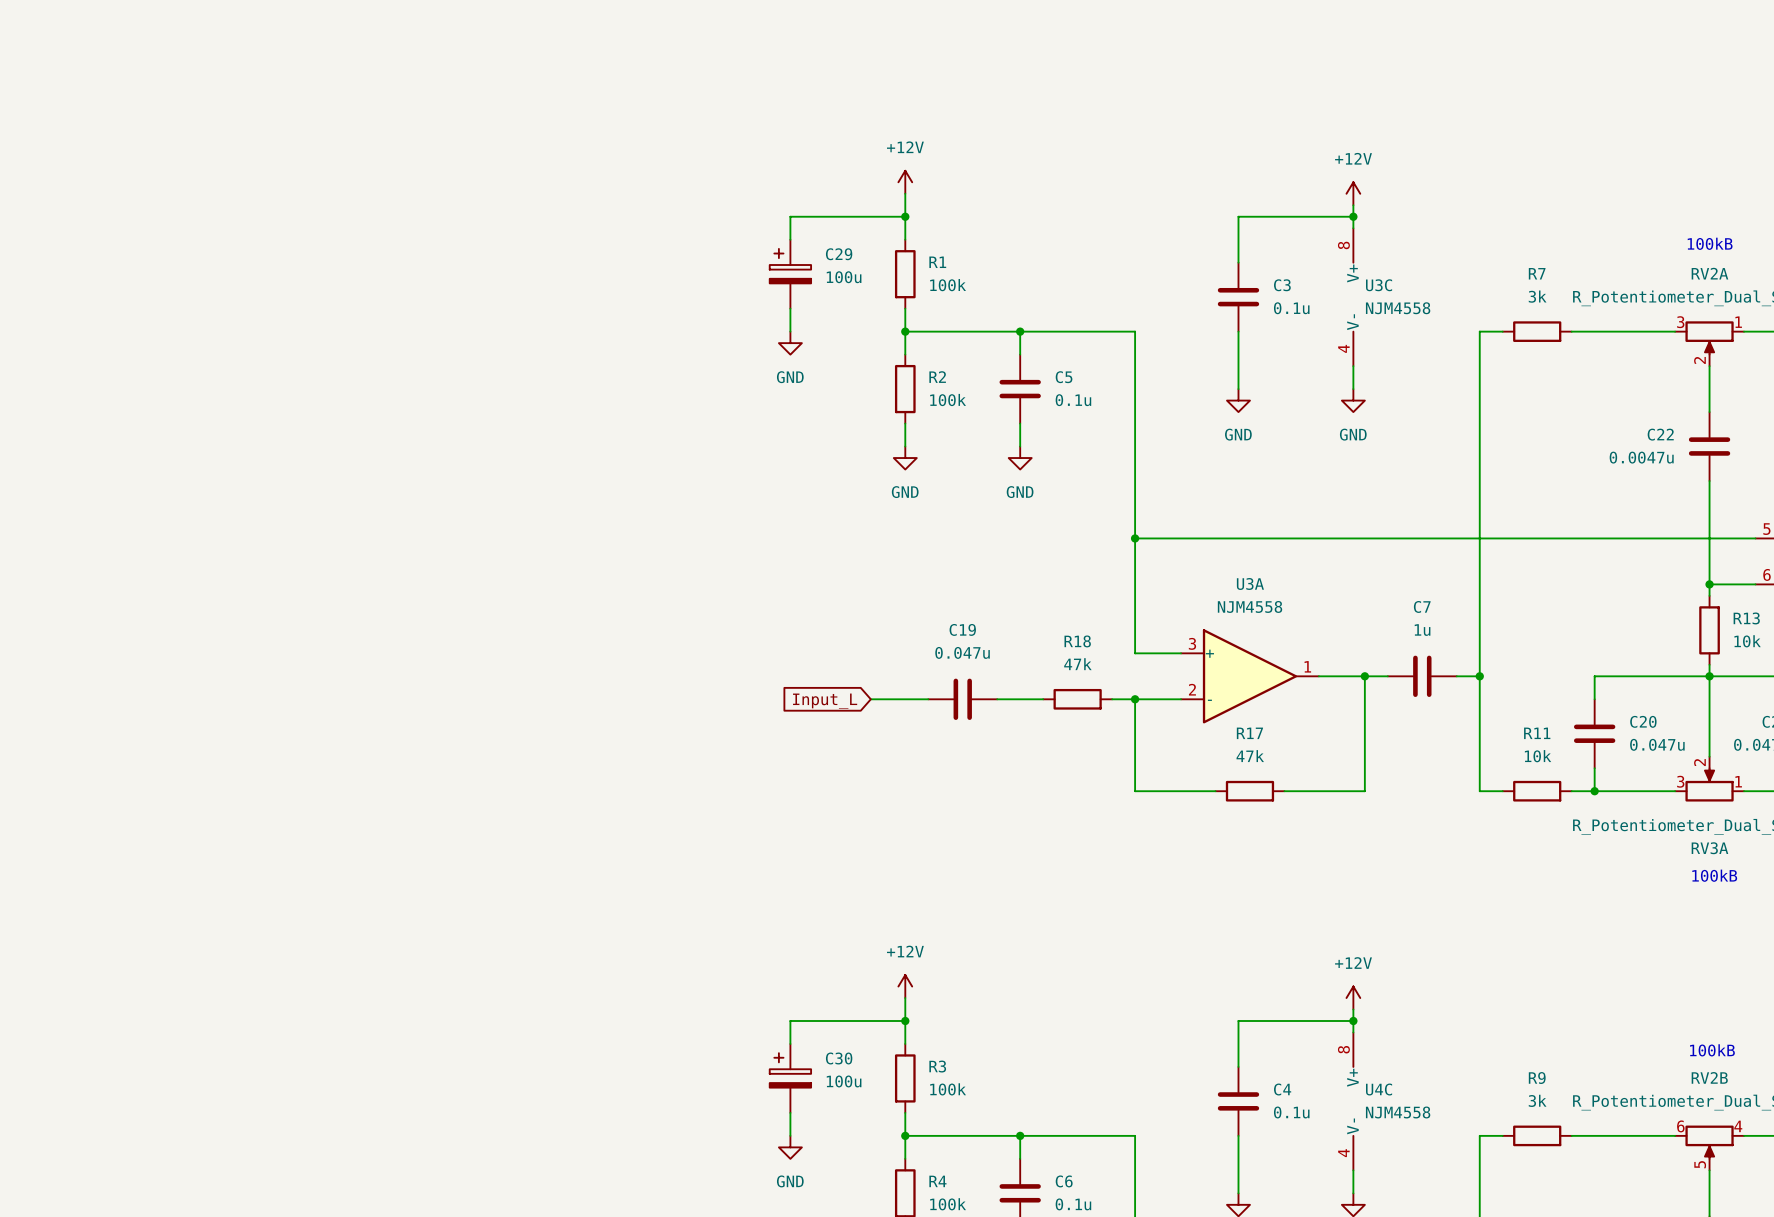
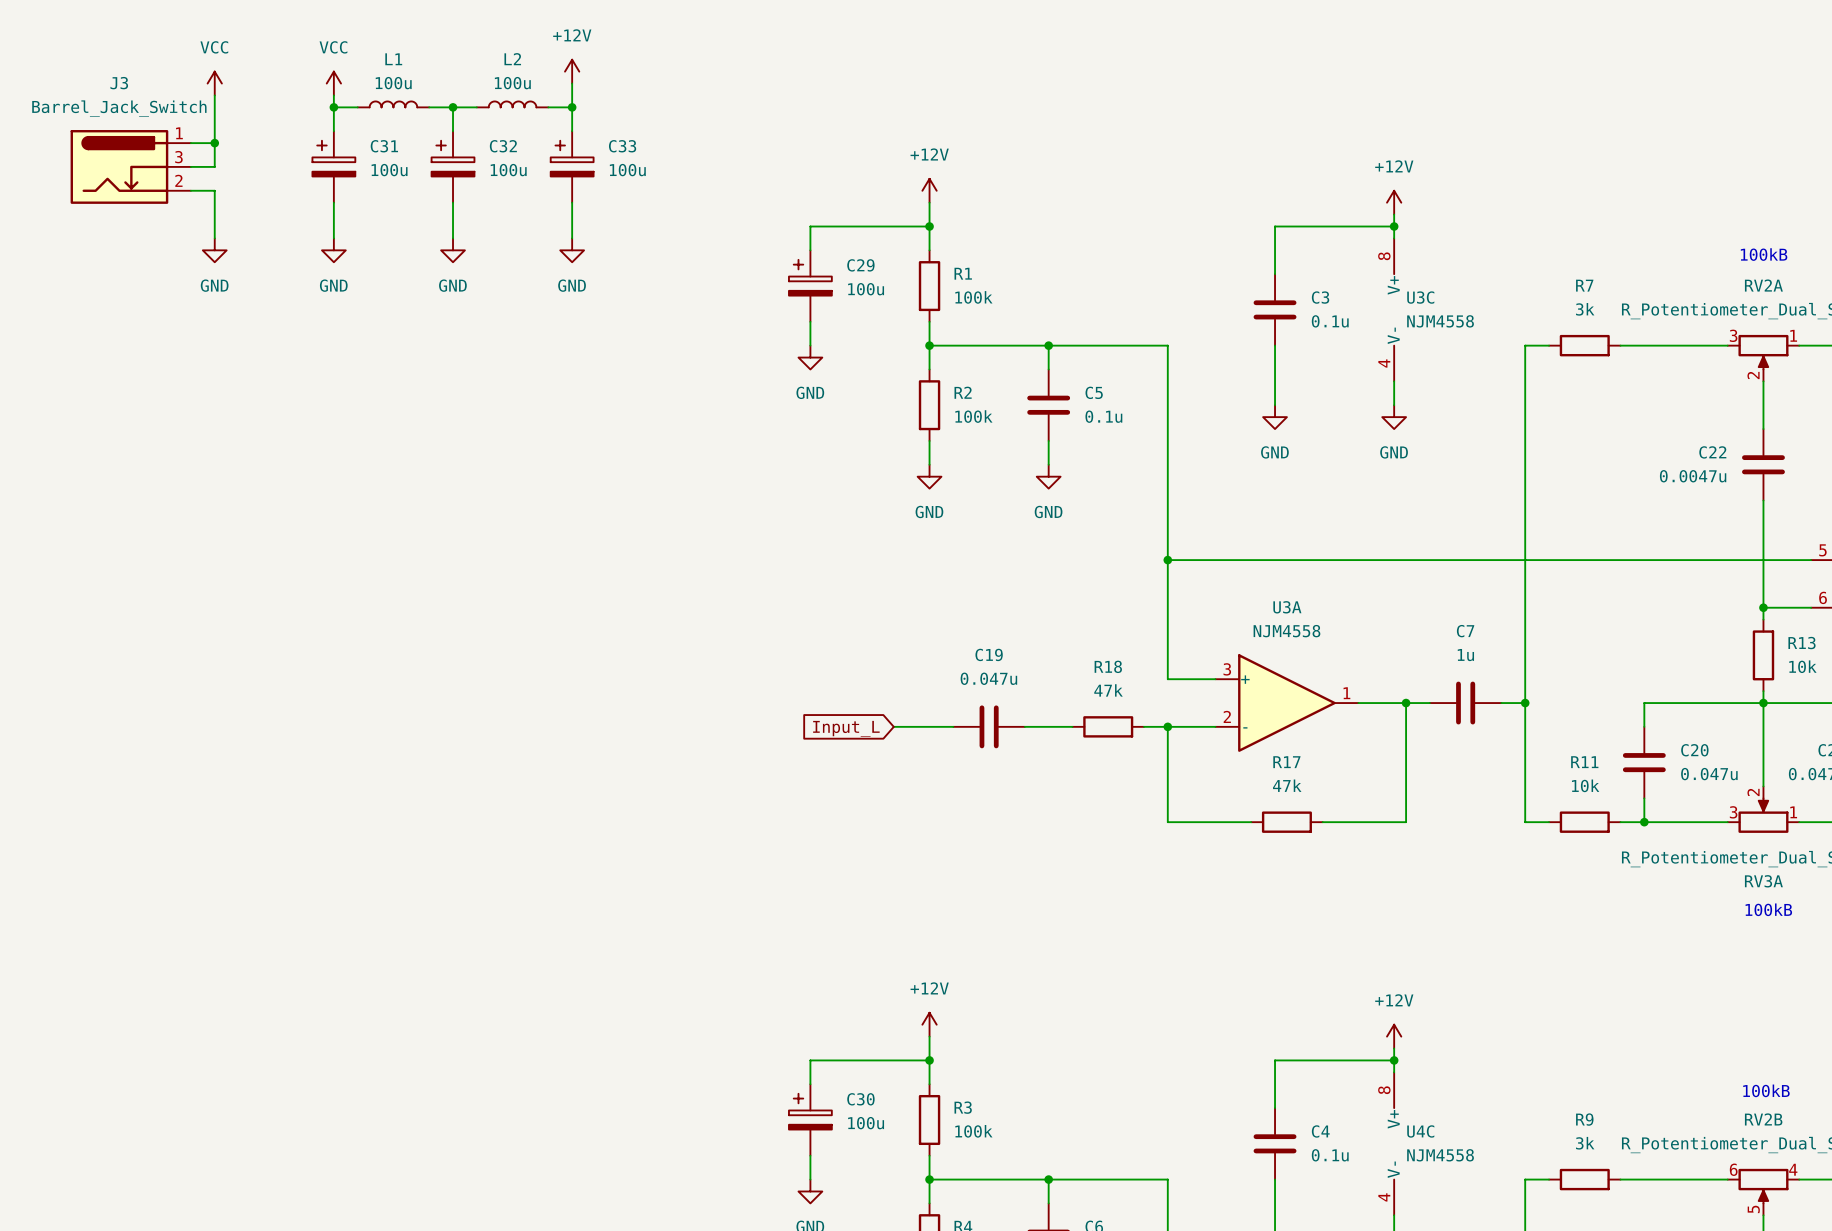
power symbol: none -> +12V (572, 71)
power symbol: none -> VCC (214, 83)
power symbol: none -> VCC (333, 83)
wire: none -> (572, 83) (572, 131)
wire: none -> (214, 95) (214, 166) (190, 166)
wire: none -> (333, 95) (333, 131)
L1: none -> 100u (393, 104)
L2: none -> 100u (512, 104)
wire: none -> (333, 107) (357, 107)
junction: none -> (333, 107)
wire: none -> (429, 107) (476, 107)
wire: none -> (453, 107) (453, 131)
junction: none -> (453, 107)
wire: none -> (548, 107) (572, 107)
junction: none -> (572, 107)
wire: none -> (190, 143) (214, 143)
junction: none -> (214, 143)
J3: none -> Barrel_Jack_Switch (130, 166)
C31: none -> 100u (333, 166)
C32: none -> 100u (453, 166)
C33: none -> 100u (572, 166)
wire: none -> (190, 190) (214, 190) (214, 238)
wire: none -> (333, 202) (333, 238)
wire: none -> (453, 202) (453, 238)
wire: none -> (572, 202) (572, 238)
power symbol: none -> GND (214, 250)
power symbol: none -> GND (333, 250)
power symbol: none -> GND (453, 250)
power symbol: none -> GND (572, 250)

